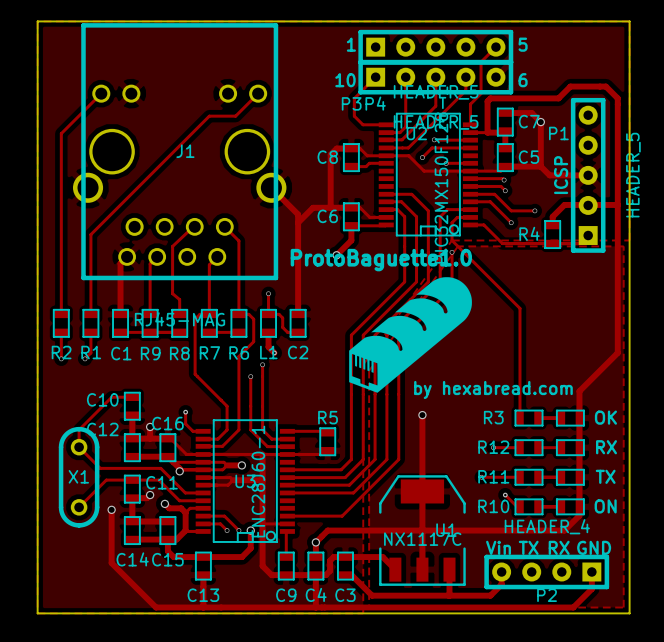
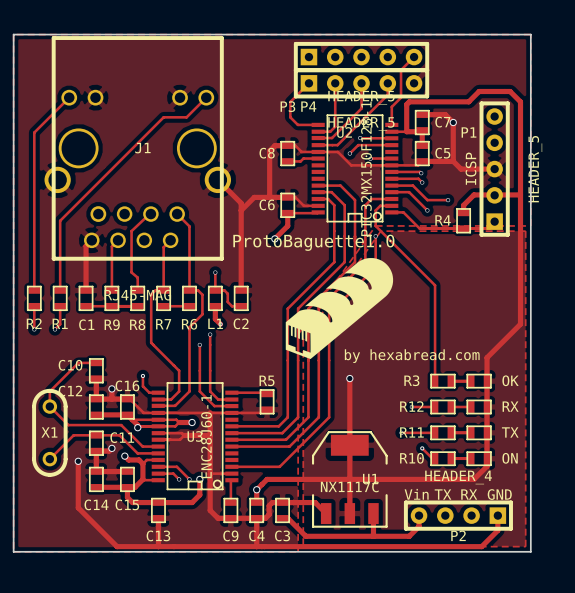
text: 1 (351, 44) -> none
text: 5 (523, 44) -> none
text: 10 (345, 80) -> none
text: 6 (523, 80) -> none

